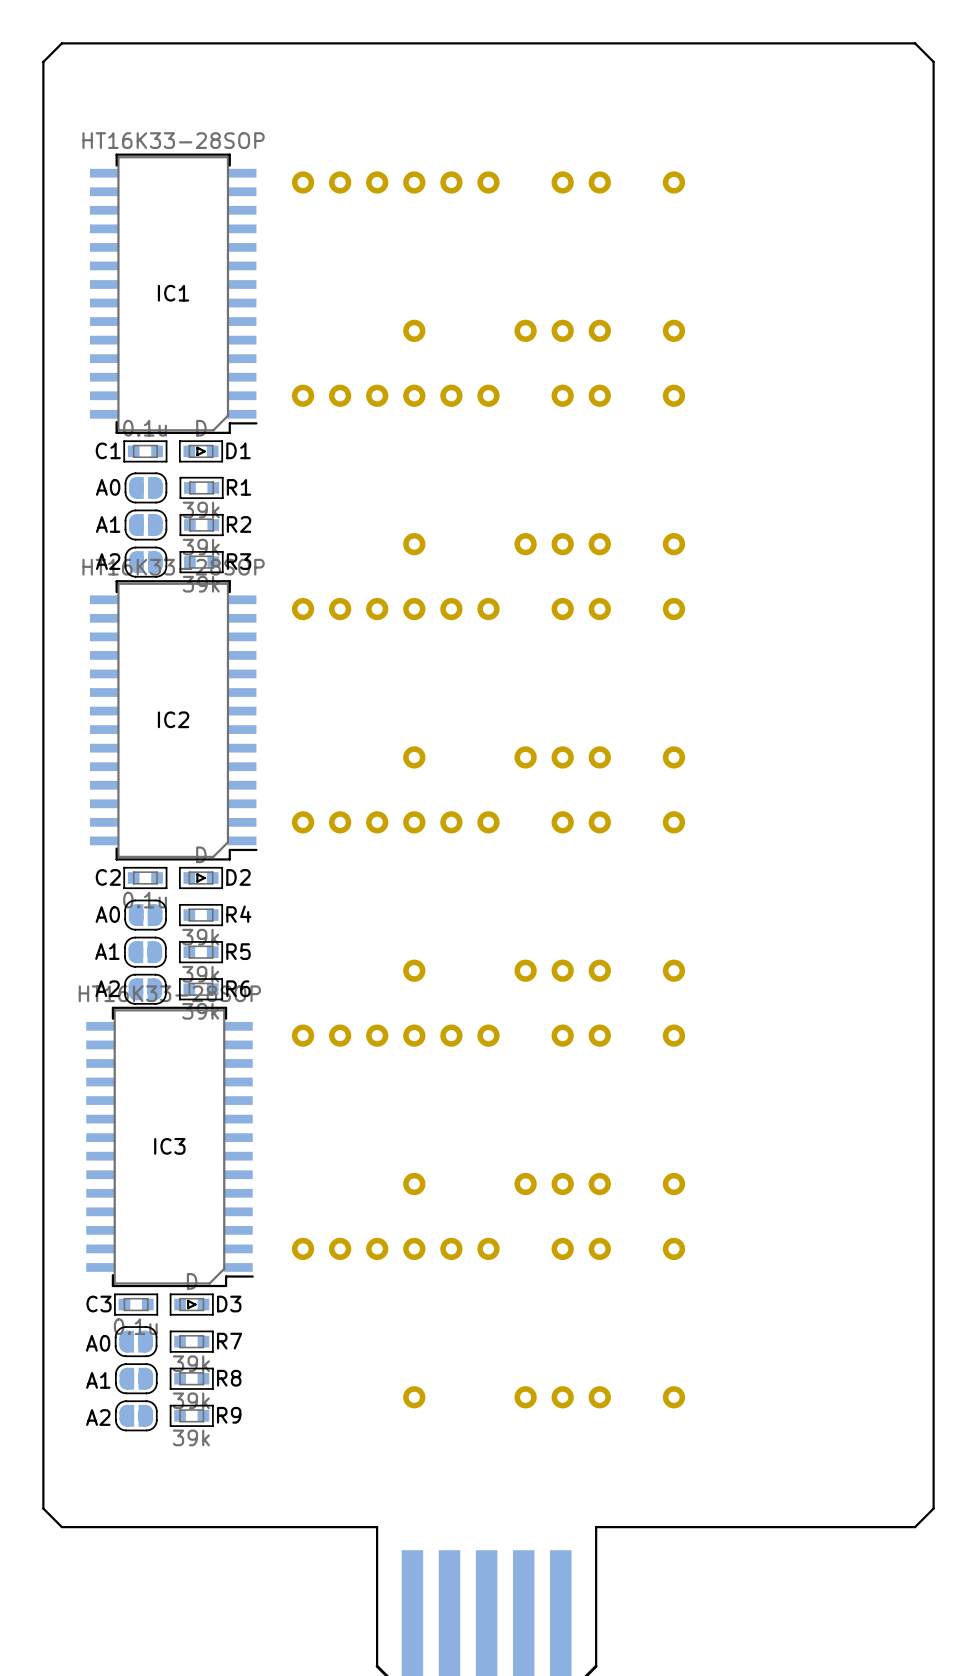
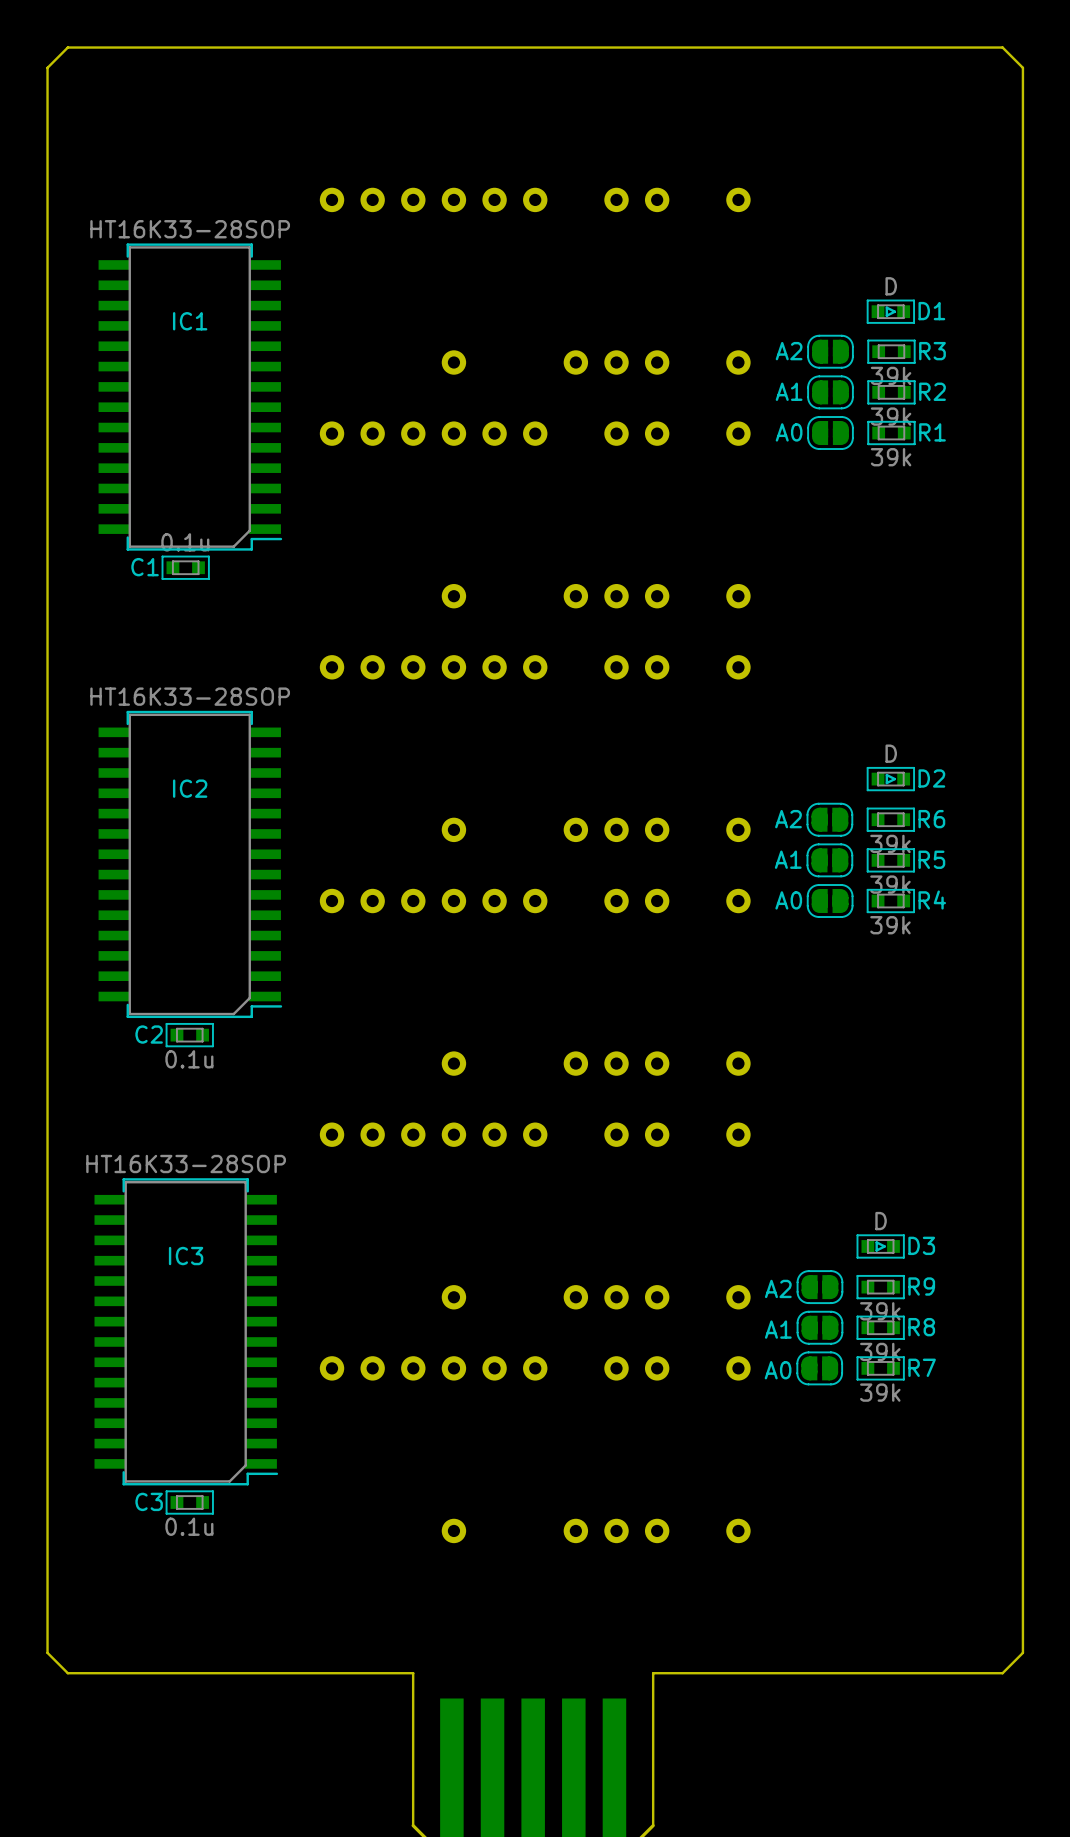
IC1 position: (173, 293) -> (190, 397)
part: none -> A2 (830, 351)
part: none -> A1 (830, 392)
part: none -> A0 (830, 433)
C1 position: (145, 451) -> (185, 567)
D1 position: (201, 451) -> (890, 311)
part: A0 (145, 487) -> none
R1 position: (201, 487) -> (891, 433)
part: A1 (145, 525) -> none
R2 position: (201, 525) -> (891, 392)
part: A2 (145, 562) -> none
R3 position: (201, 562) -> (891, 351)
IC2 position: (173, 720) -> (190, 864)
part: none -> A2 (829, 819)
part: none -> A1 (829, 860)
part: none -> A0 (830, 901)
C2 position: (145, 877) -> (189, 1035)
D2 position: (201, 877) -> (890, 779)
part: A0 (145, 915) -> none
R4 position: (201, 915) -> (890, 901)
part: A1 (145, 952) -> none
R5 position: (201, 952) -> (890, 860)
part: A2 (145, 989) -> none
R6 position: (201, 989) -> (890, 819)
IC3 position: (170, 1146) -> (186, 1331)
part: none -> A2 (819, 1287)
part: none -> A1 (819, 1327)
part: none -> A0 (819, 1368)
C3 position: (136, 1304) -> (189, 1502)
D3 position: (191, 1304) -> (880, 1246)
part: A0 (136, 1341) -> none
R7 position: (191, 1341) -> (880, 1368)
part: A1 (136, 1378) -> none
R8 position: (191, 1378) -> (880, 1327)
part: A2 (136, 1415) -> none
R9 position: (191, 1415) -> (880, 1287)

